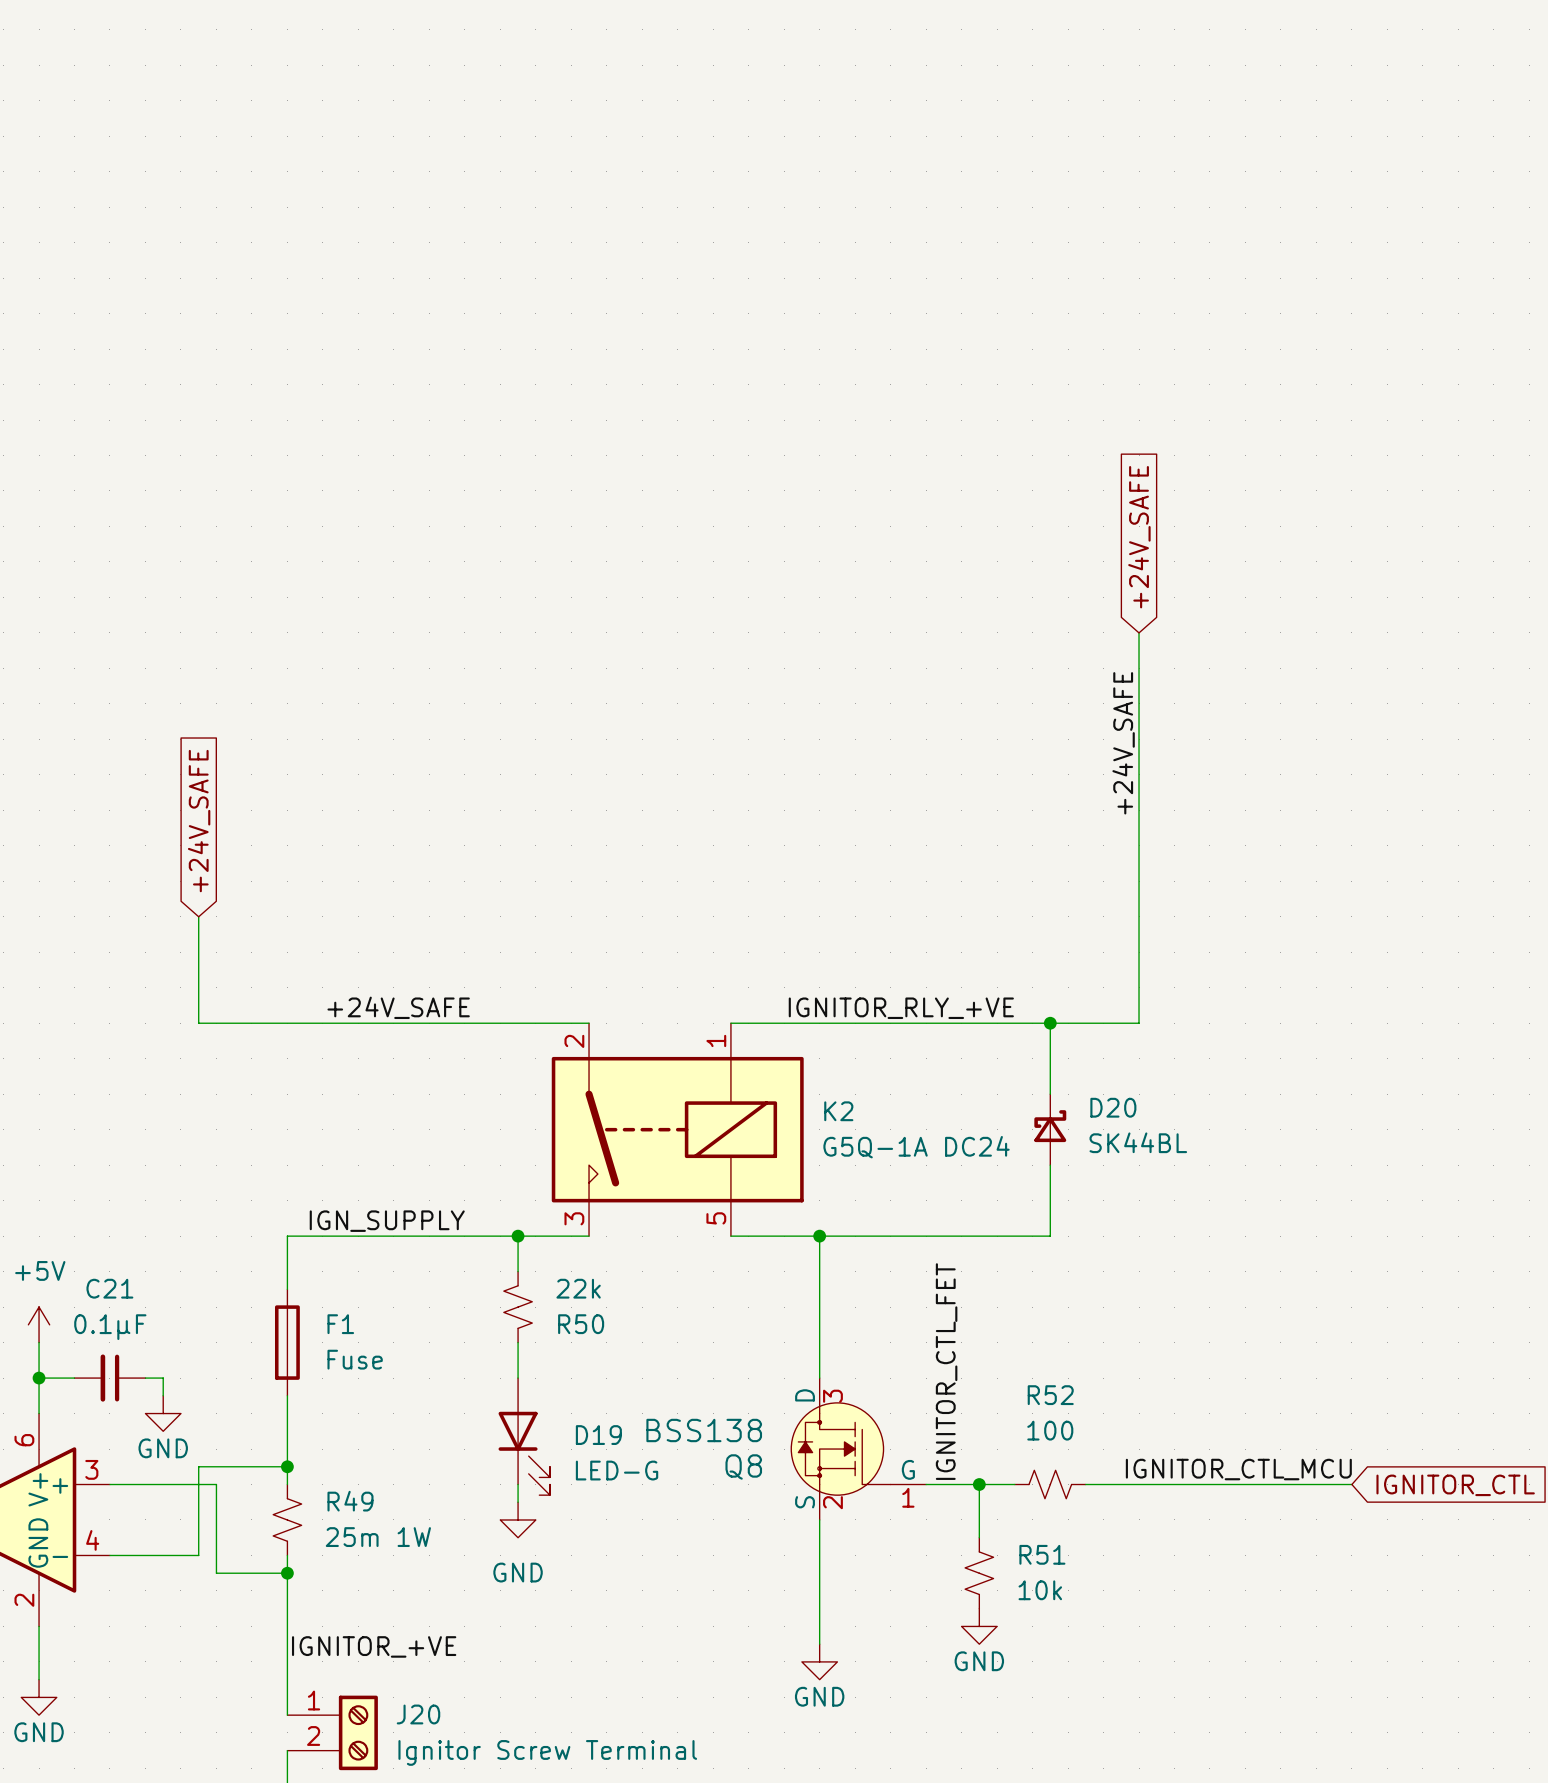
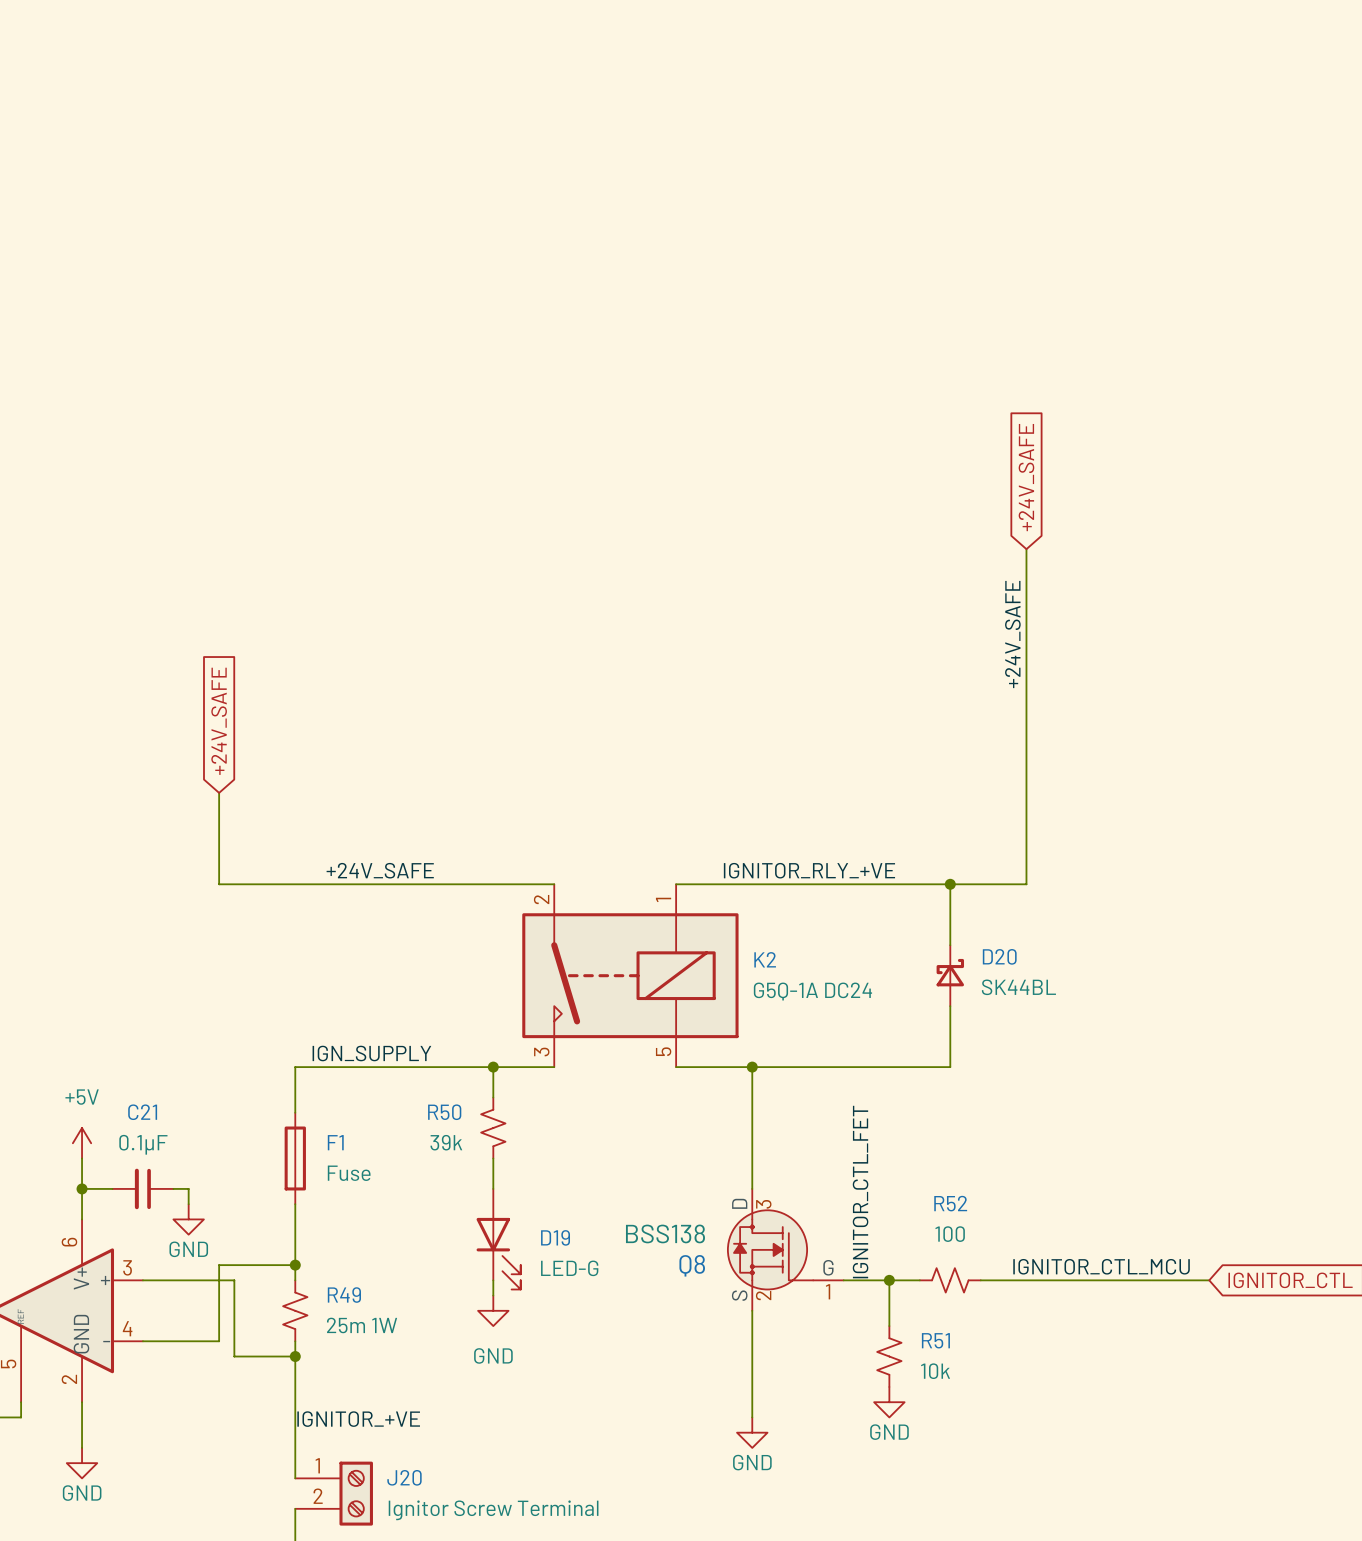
R50 value: 22k (578, 1288) -> 39k (446, 1142)
R50 name position: R50 (581, 1324) -> R50 (444, 1112)

